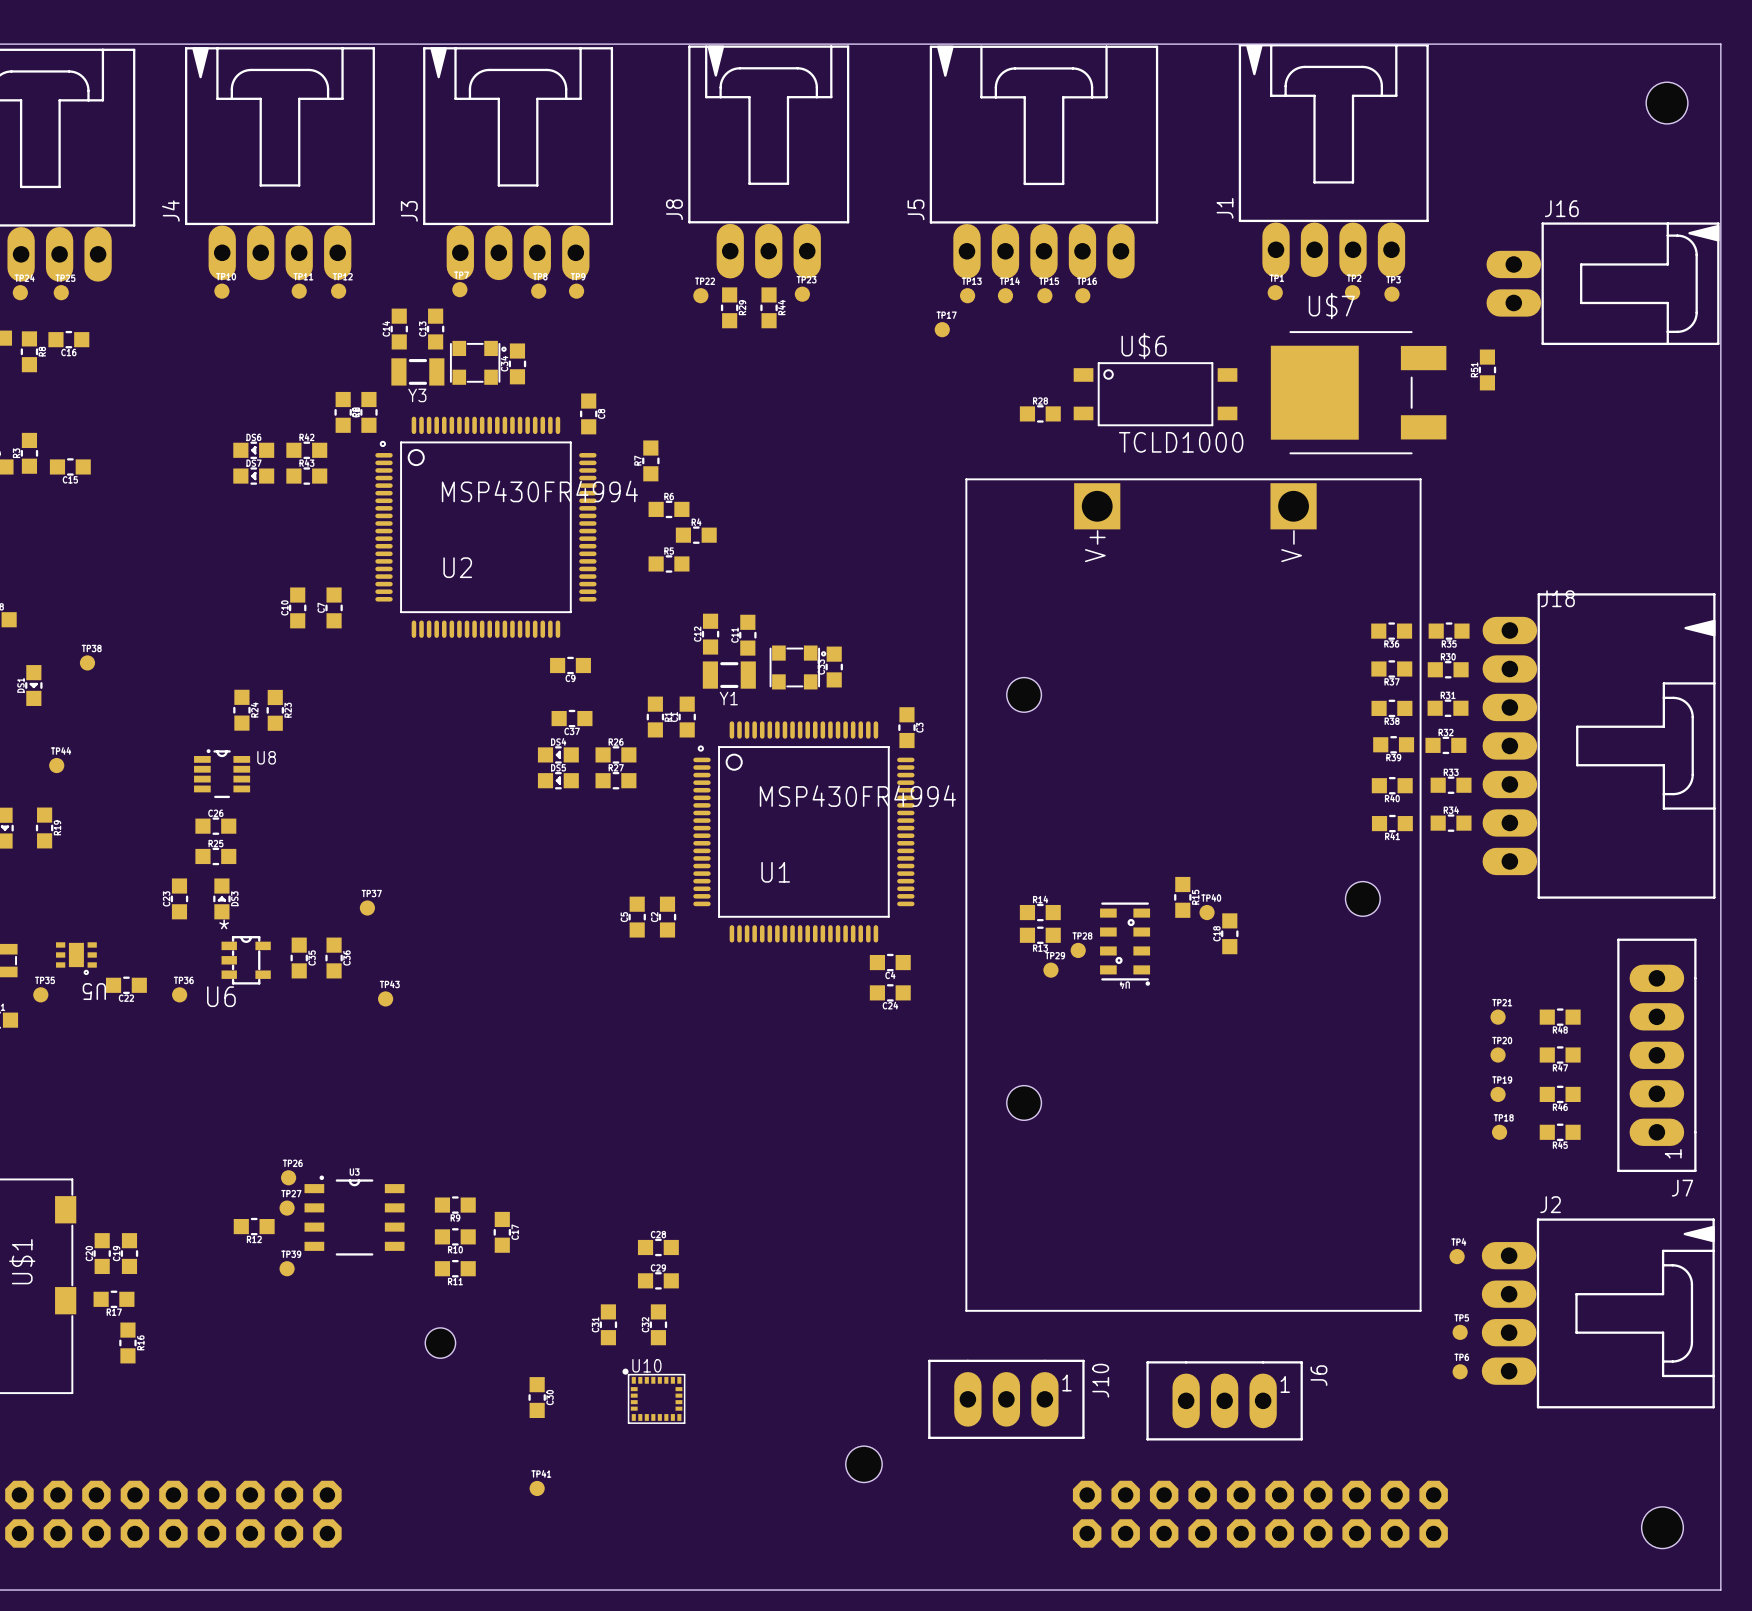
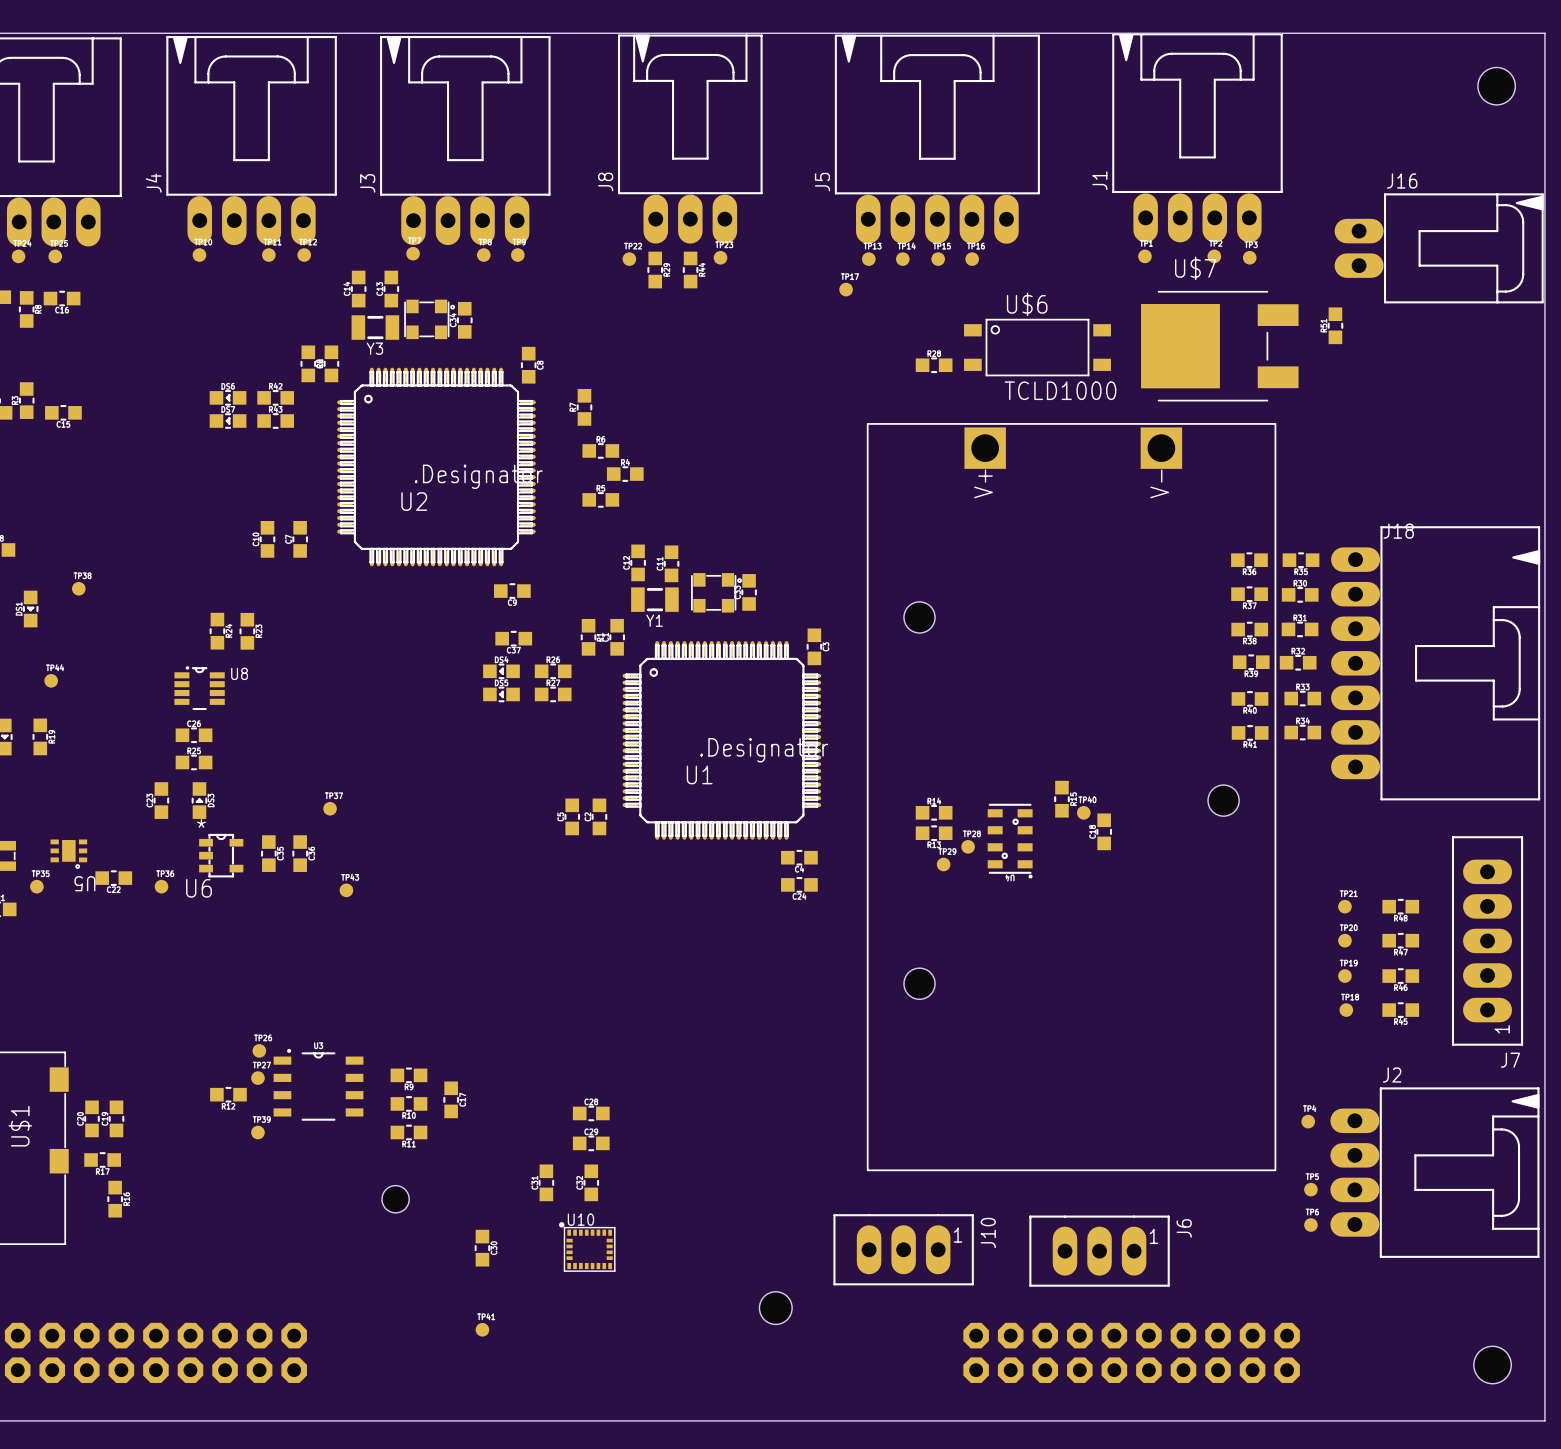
U2 footprint: [375, 416, 597, 638] -> [337, 367, 536, 567]
U2 value: MSP430FR4994 (539, 491) -> none
U1 footprint: [693, 721, 915, 943] -> [622, 641, 822, 840]
U1 value: MSP430FR4994 (857, 796) -> none

